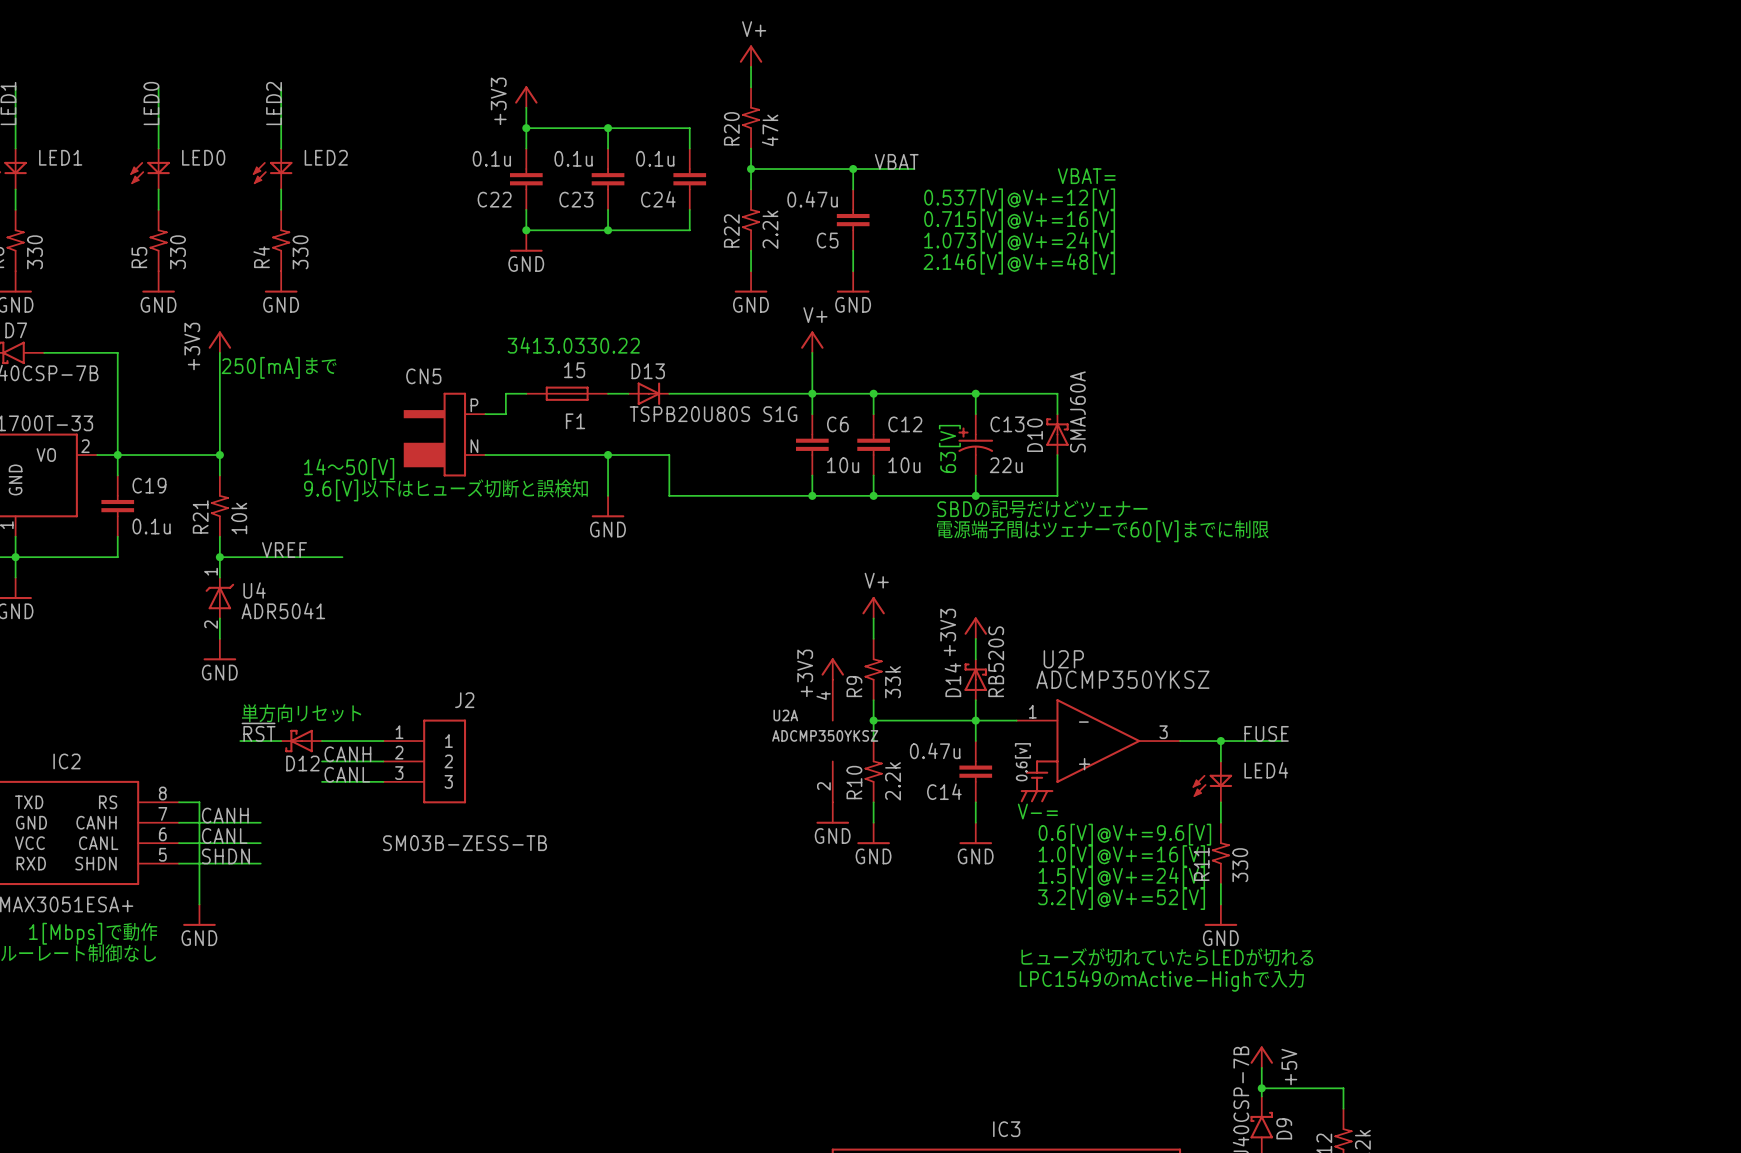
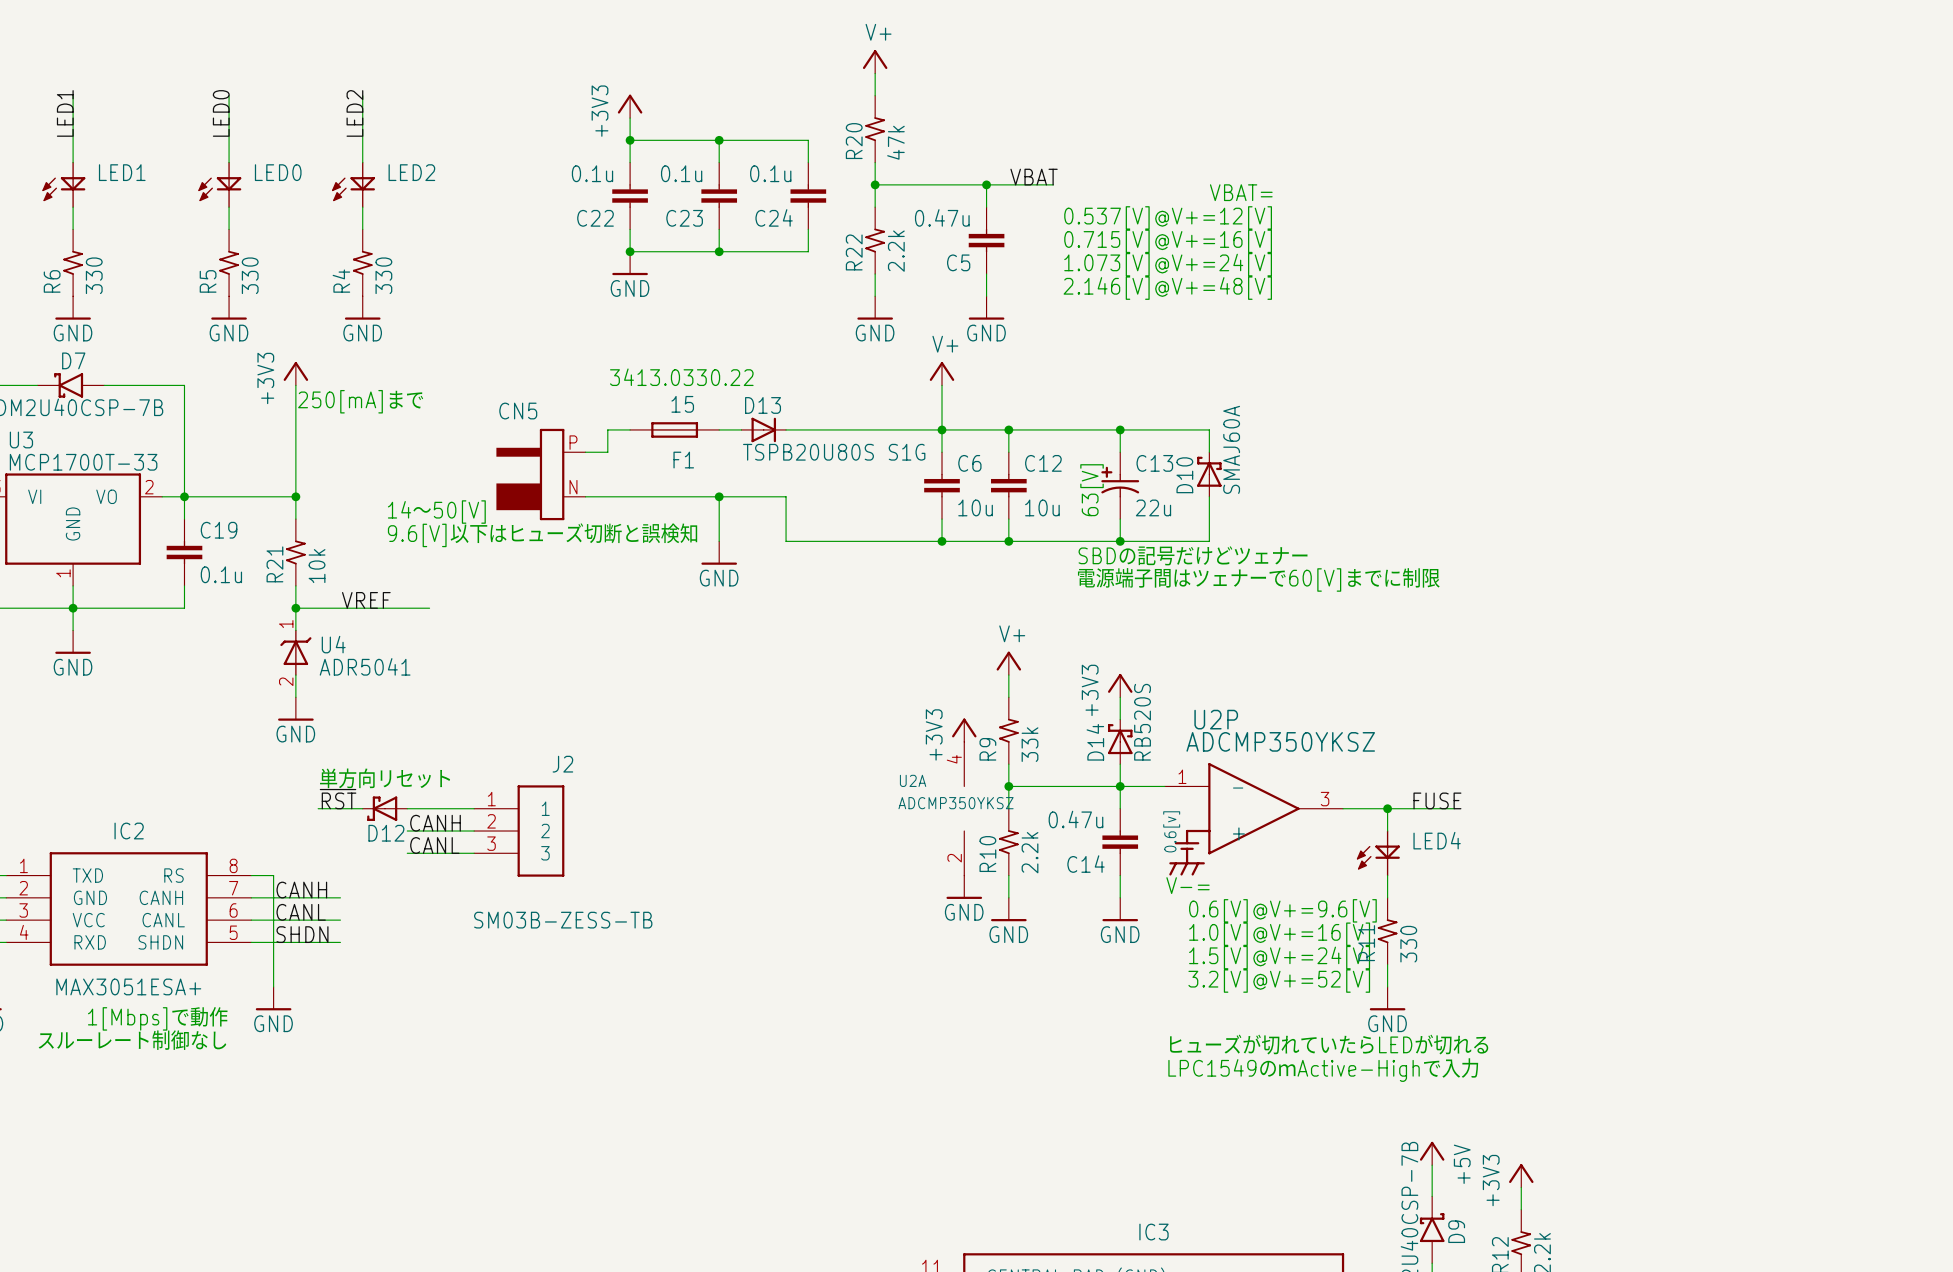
power symbol: none -> +3V3 (1521, 1175)
wire: (1261, 1088) (1343, 1088) -> none
junction: (1261, 1088) -> none

